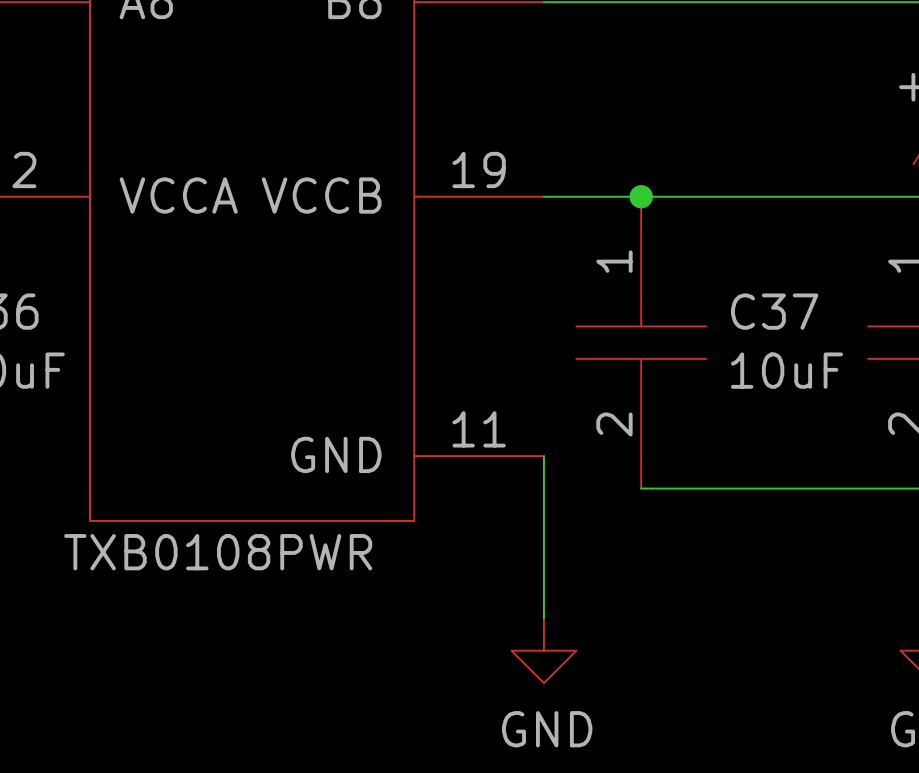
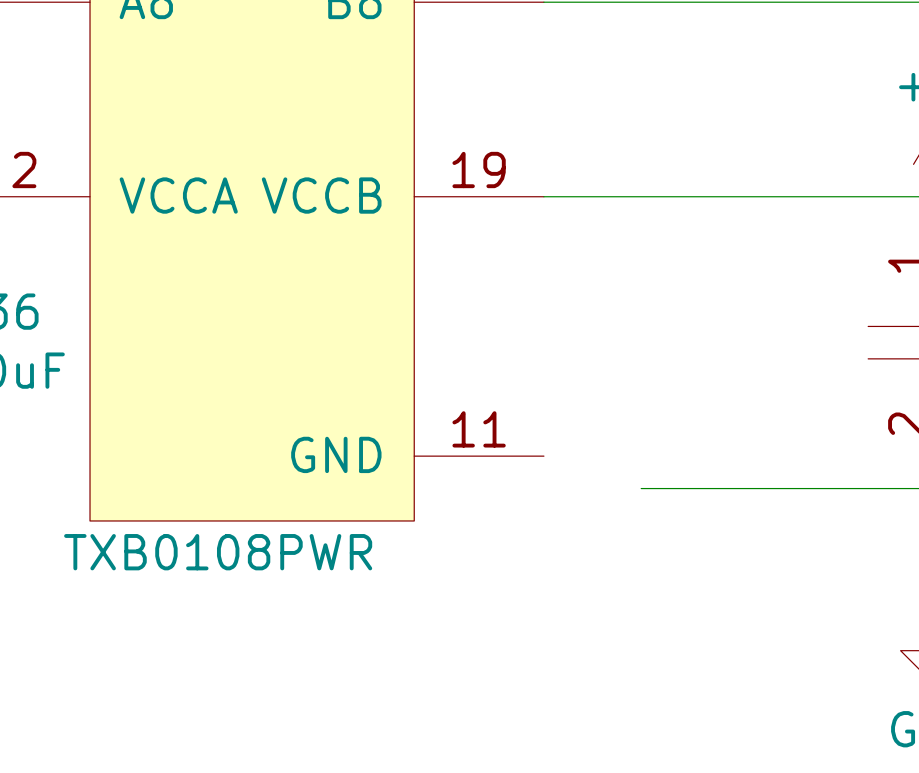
junction: (641, 196) -> none
C37: (641, 342) -> none
wire: (543, 456) (543, 618) -> none
power symbol: GND (543, 650) -> none

